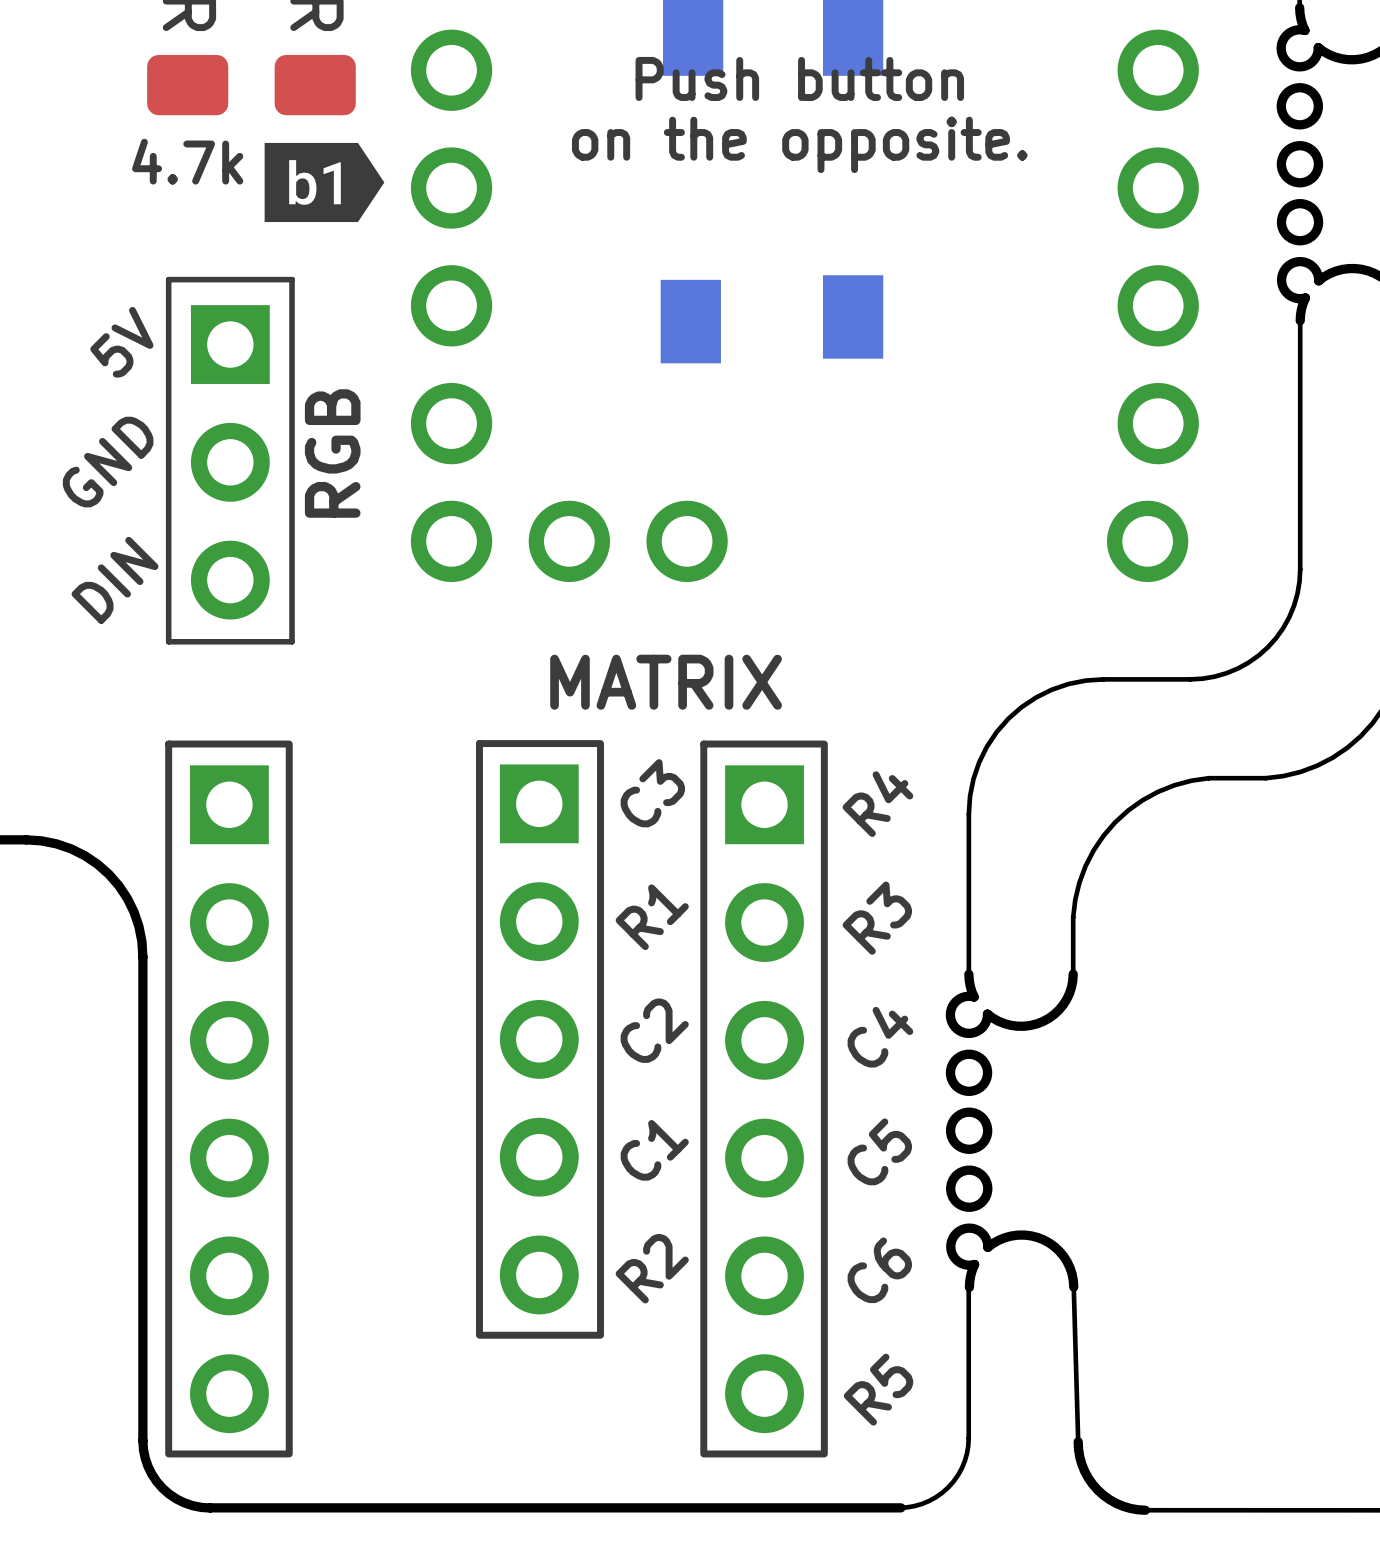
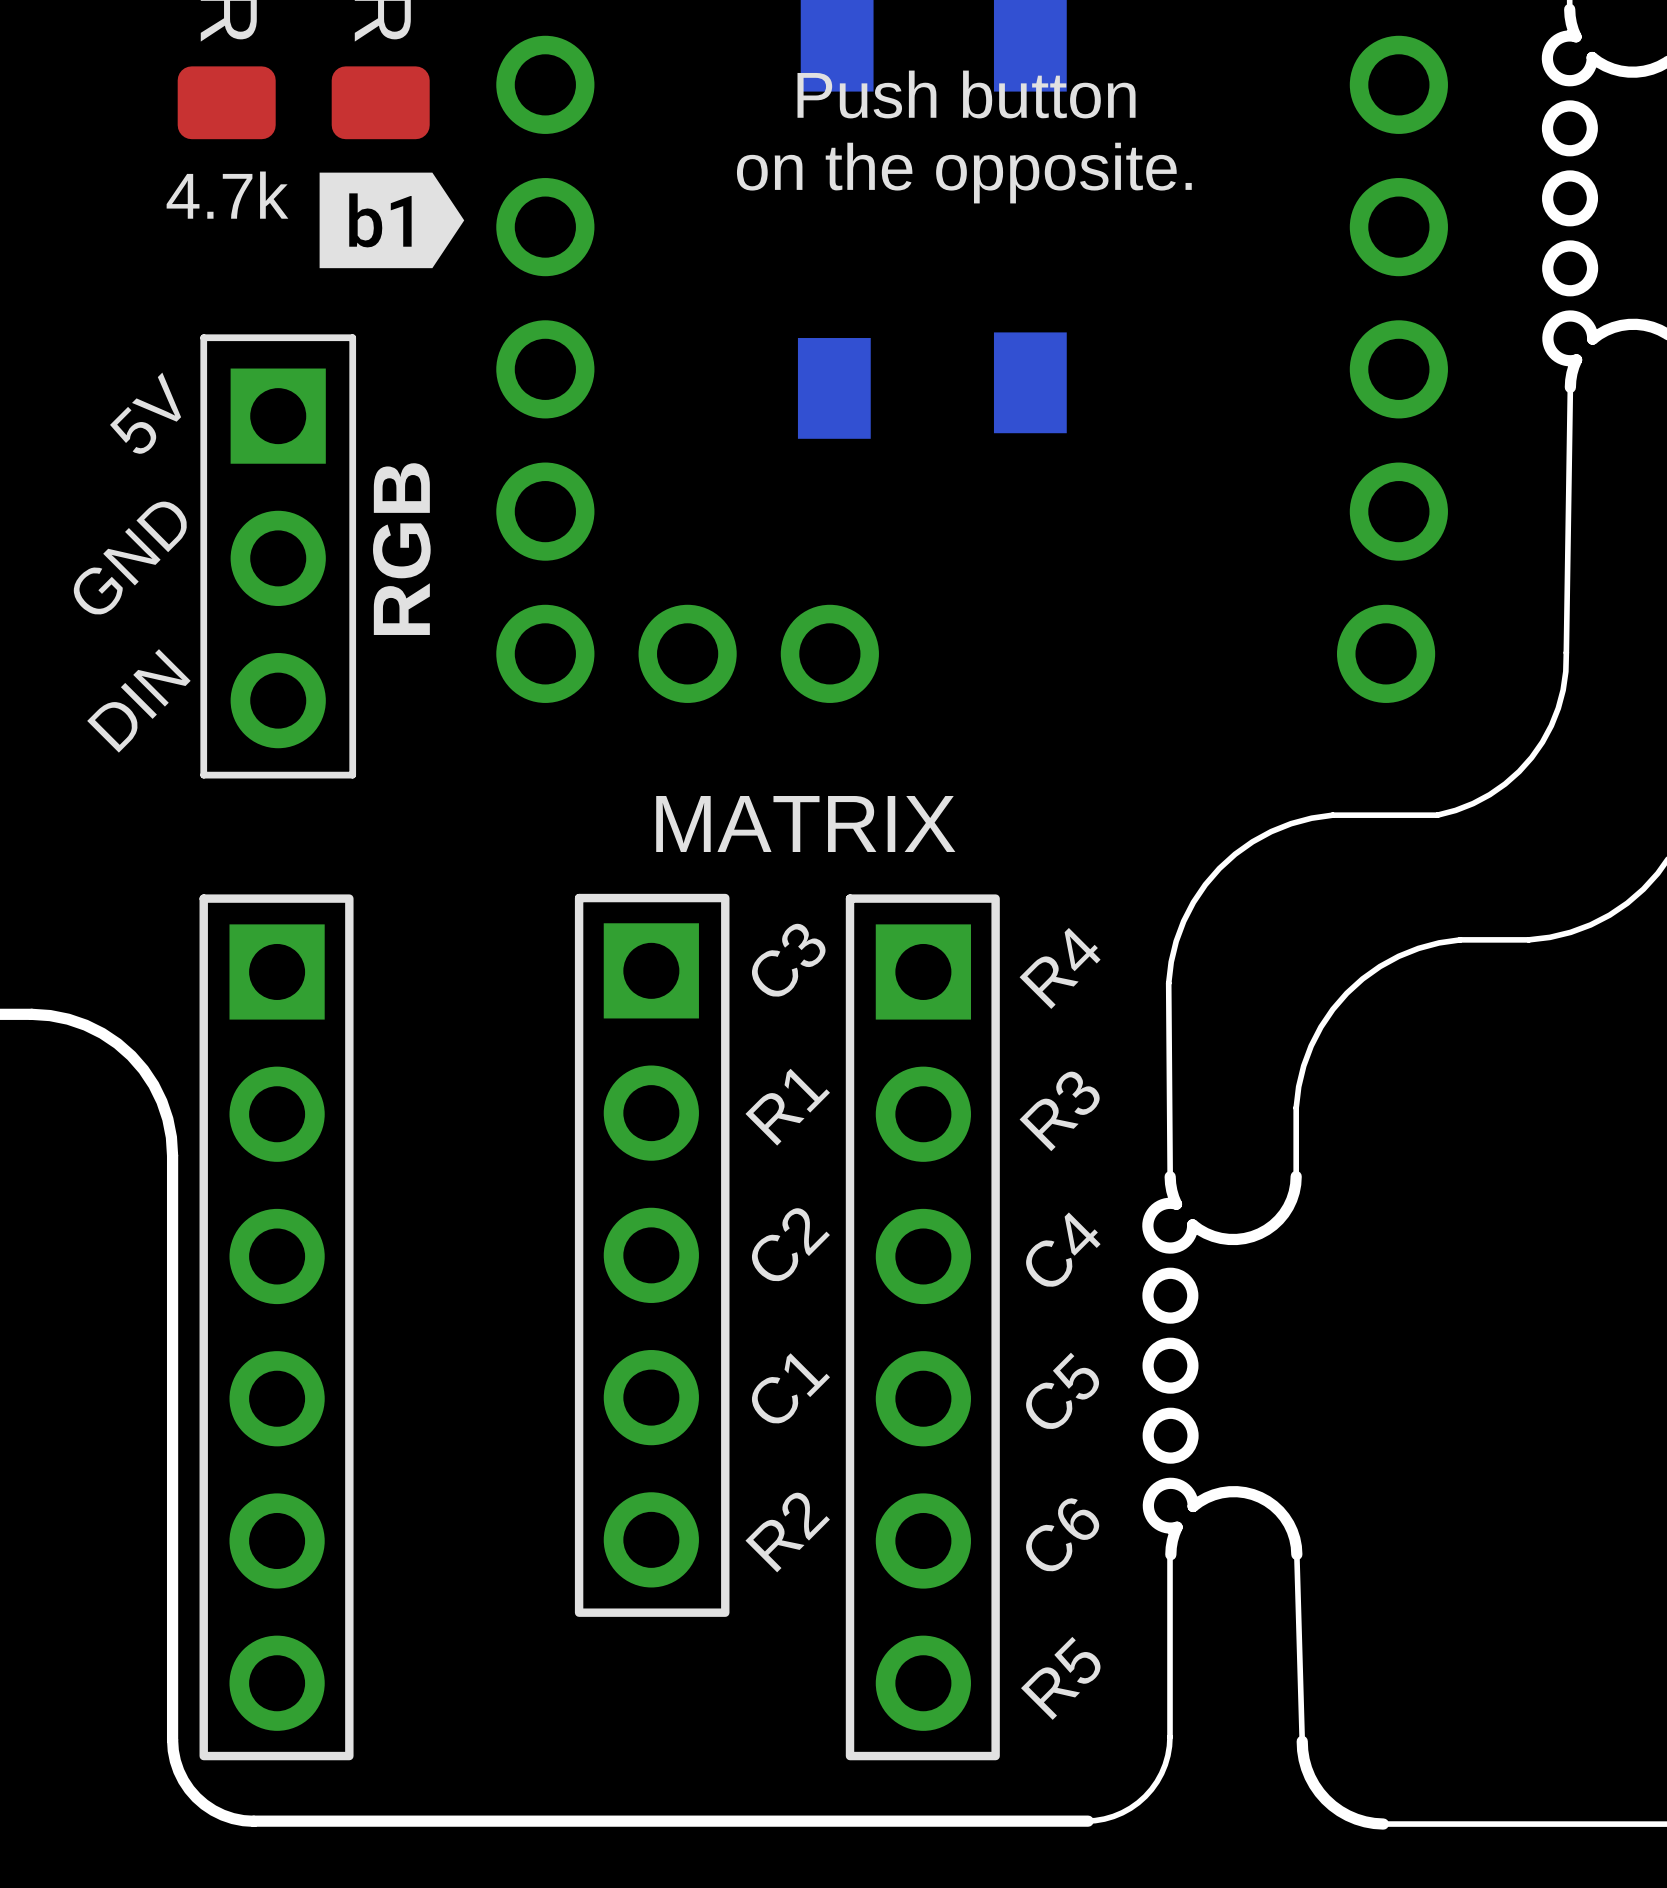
board edge: (1300, 320) (1300, 569) (1297, 593) (1289, 617) (1276, 637) (1258, 655) (1226, 673) (1202, 678) (1103, 679) (1068, 683) (1036, 697) (1008, 718) (986, 746) (979, 762) (970, 796) (968, 974) -> (1570, 387) (1565, 671) (1558, 708) (1551, 725) (1531, 757) (1519, 771) (1505, 784) (1473, 803) (1437, 815) (1332, 815) (1291, 823) (1252, 841) (1219, 868) (1205, 884) (1183, 921) (1171, 962) (1168, 983) (1170, 1176)

